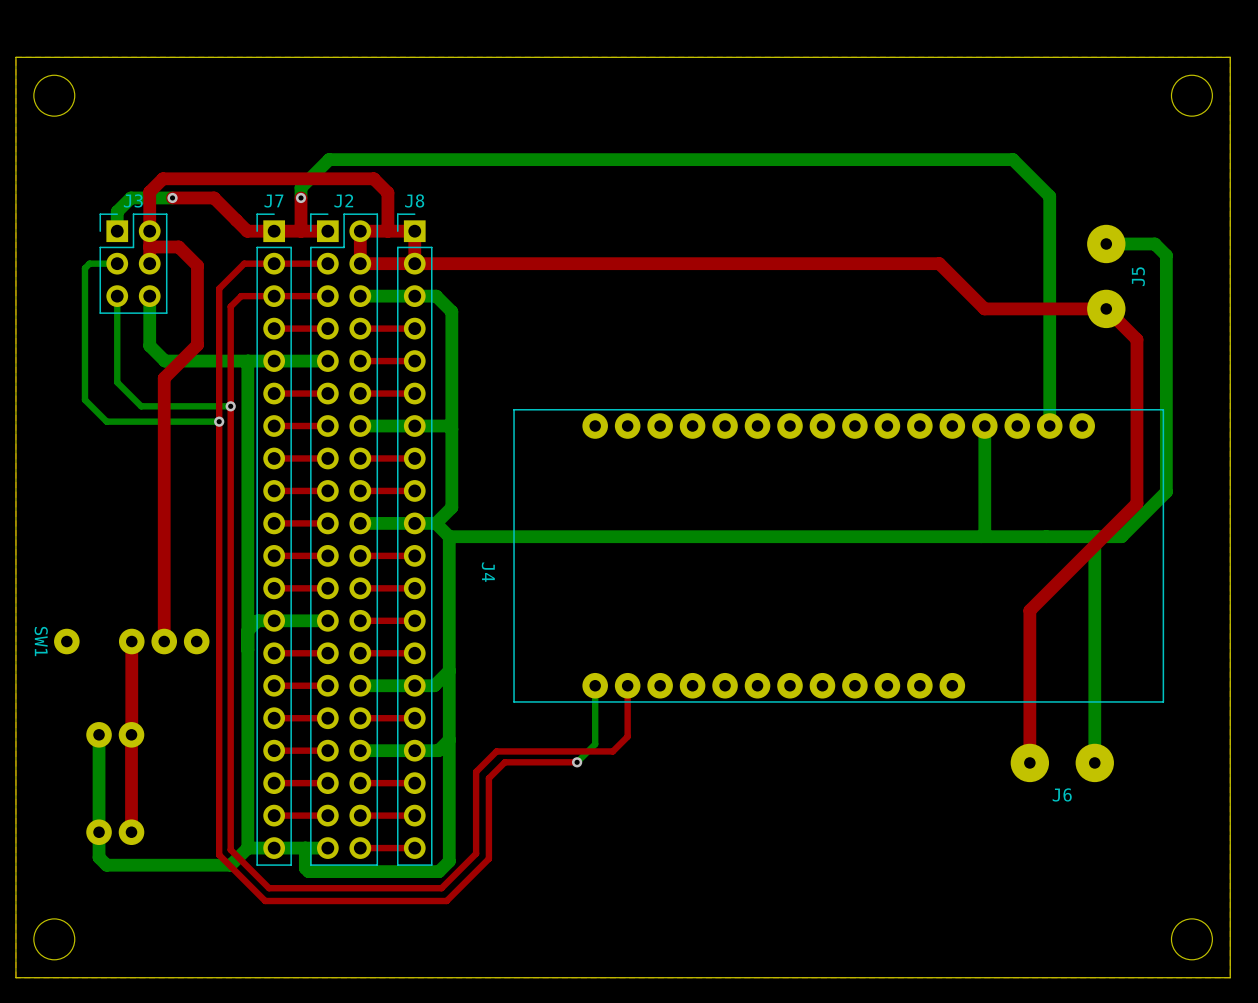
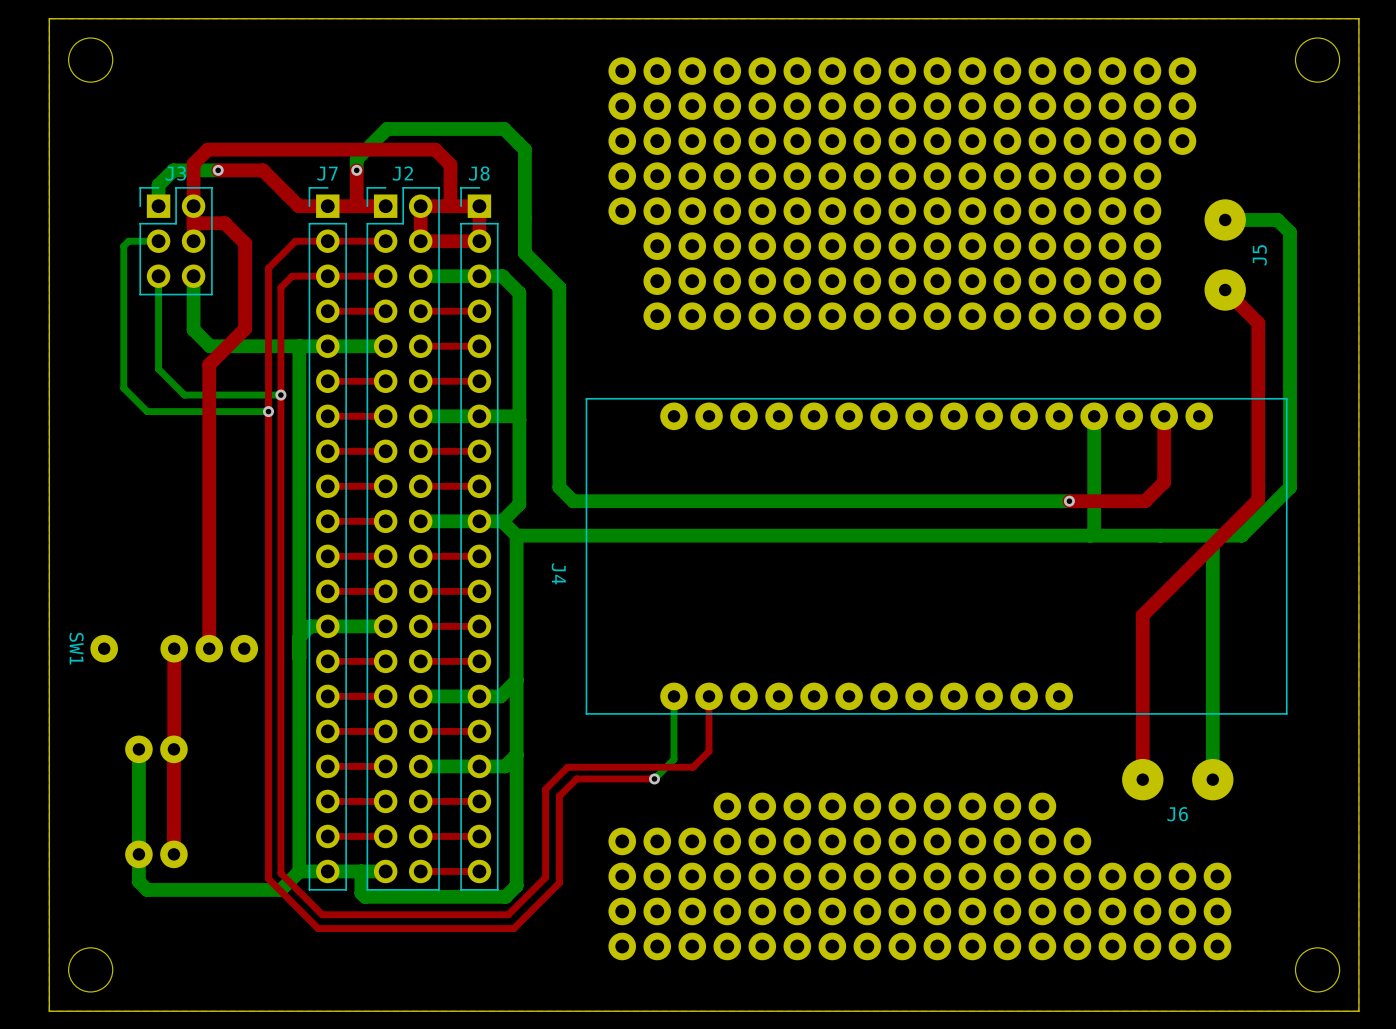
part: none -> (622, 71)
part: none -> (657, 71)
part: none -> (692, 71)
part: none -> (727, 71)
part: none -> (762, 71)
part: none -> (797, 71)
part: none -> (832, 71)
part: none -> (867, 71)
part: none -> (902, 71)
part: none -> (937, 71)
part: none -> (972, 71)
part: none -> (1007, 71)
part: none -> (1042, 71)
part: none -> (1077, 71)
part: none -> (1112, 71)
part: none -> (1147, 71)
part: none -> (1182, 71)
part: none -> (622, 106)
part: none -> (657, 106)
part: none -> (692, 106)
part: none -> (727, 106)
part: none -> (762, 106)
part: none -> (797, 106)
part: none -> (832, 106)
part: none -> (867, 106)
part: none -> (902, 106)
part: none -> (937, 106)
part: none -> (972, 106)
part: none -> (1007, 106)
part: none -> (1042, 106)
part: none -> (1077, 106)
part: none -> (1112, 106)
part: none -> (1147, 106)
part: none -> (1182, 106)
bottom track: (437, 159) (1012, 159) (1049, 196) (1049, 426) -> (504, 129) (524, 149) (524, 253) (559, 287) (559, 487) (573, 501) (1069, 501)
part: none -> (622, 141)
part: none -> (657, 141)
part: none -> (692, 141)
part: none -> (727, 141)
part: none -> (762, 141)
part: none -> (797, 141)
part: none -> (832, 141)
part: none -> (867, 141)
part: none -> (902, 141)
part: none -> (937, 141)
part: none -> (972, 141)
part: none -> (1007, 141)
part: none -> (1042, 141)
part: none -> (1077, 141)
part: none -> (1112, 141)
part: none -> (1147, 141)
part: none -> (1182, 141)
part: none -> (622, 176)
part: none -> (657, 176)
part: none -> (692, 176)
part: none -> (727, 176)
part: none -> (762, 176)
part: none -> (797, 176)
part: none -> (832, 176)
part: none -> (867, 176)
part: none -> (902, 176)
part: none -> (937, 176)
part: none -> (972, 176)
part: none -> (1007, 176)
part: none -> (1042, 176)
part: none -> (1077, 176)
part: none -> (1112, 176)
part: none -> (1147, 176)
part: none -> (622, 211)
part: none -> (657, 211)
part: none -> (692, 211)
part: none -> (727, 211)
part: none -> (762, 211)
part: none -> (797, 211)
part: none -> (832, 211)
part: none -> (867, 211)
part: none -> (902, 211)
part: none -> (937, 211)
part: none -> (972, 211)
part: none -> (1007, 211)
part: none -> (1042, 211)
part: none -> (1077, 211)
part: none -> (1112, 211)
part: none -> (1147, 211)
top track: (414, 263) (939, 263) (984, 308) (1106, 308) -> none
part: none -> (657, 246)
part: none -> (692, 246)
part: none -> (727, 246)
part: none -> (762, 246)
part: none -> (797, 246)
part: none -> (832, 246)
part: none -> (867, 246)
part: none -> (902, 246)
part: none -> (937, 246)
part: none -> (972, 246)
part: none -> (1007, 246)
part: none -> (1042, 246)
part: none -> (1077, 246)
part: none -> (1112, 246)
part: none -> (1147, 246)
part: none -> (657, 281)
part: none -> (692, 281)
part: none -> (727, 281)
part: none -> (762, 281)
part: none -> (797, 281)
part: none -> (832, 281)
part: none -> (867, 281)
part: none -> (902, 281)
part: none -> (937, 281)
part: none -> (972, 281)
part: none -> (1007, 281)
part: none -> (1042, 281)
part: none -> (1077, 281)
part: none -> (1112, 281)
part: none -> (1147, 281)
part: none -> (657, 316)
part: none -> (692, 316)
part: none -> (727, 316)
part: none -> (762, 316)
part: none -> (797, 316)
part: none -> (832, 316)
part: none -> (867, 316)
part: none -> (902, 316)
part: none -> (937, 316)
part: none -> (972, 316)
part: none -> (1007, 316)
part: none -> (1042, 316)
part: none -> (1077, 316)
part: none -> (1112, 316)
part: none -> (1147, 316)
top track: none -> (1164, 416) (1164, 482) (1145, 501) (1069, 501)
via: none -> (1069, 501)
part: none -> (727, 806)
part: none -> (762, 806)
part: none -> (797, 806)
part: none -> (832, 806)
part: none -> (867, 806)
part: none -> (902, 806)
part: none -> (937, 806)
part: none -> (972, 806)
part: none -> (1007, 806)
part: none -> (1042, 806)
part: none -> (622, 841)
part: none -> (657, 841)
part: none -> (692, 841)
part: none -> (727, 841)
part: none -> (762, 841)
part: none -> (797, 841)
part: none -> (832, 841)
part: none -> (867, 841)
part: none -> (902, 841)
part: none -> (937, 841)
part: none -> (972, 841)
part: none -> (1007, 841)
part: none -> (1042, 841)
part: none -> (1077, 841)
part: none -> (622, 876)
part: none -> (657, 876)
part: none -> (692, 876)
part: none -> (727, 876)
part: none -> (762, 876)
part: none -> (797, 876)
part: none -> (832, 876)
part: none -> (867, 876)
part: none -> (902, 876)
part: none -> (937, 876)
part: none -> (972, 876)
part: none -> (1007, 876)
part: none -> (1042, 876)
part: none -> (1077, 876)
part: none -> (1112, 876)
part: none -> (1147, 876)
part: none -> (1182, 876)
part: none -> (1217, 876)
part: none -> (622, 911)
part: none -> (657, 911)
part: none -> (692, 911)
part: none -> (727, 911)
part: none -> (762, 911)
part: none -> (797, 911)
part: none -> (832, 911)
part: none -> (867, 911)
part: none -> (902, 911)
part: none -> (937, 911)
part: none -> (972, 911)
part: none -> (1007, 911)
part: none -> (1042, 911)
part: none -> (1077, 911)
part: none -> (1112, 911)
part: none -> (1147, 911)
part: none -> (1182, 911)
part: none -> (1217, 911)
part: none -> (622, 946)
part: none -> (657, 946)
part: none -> (692, 946)
part: none -> (727, 946)
part: none -> (762, 946)
part: none -> (797, 946)
part: none -> (832, 946)
part: none -> (867, 946)
part: none -> (902, 946)
part: none -> (937, 946)
part: none -> (972, 946)
part: none -> (1007, 946)
part: none -> (1042, 946)
part: none -> (1077, 946)
part: none -> (1112, 946)
part: none -> (1147, 946)
part: none -> (1182, 946)
part: none -> (1217, 946)

